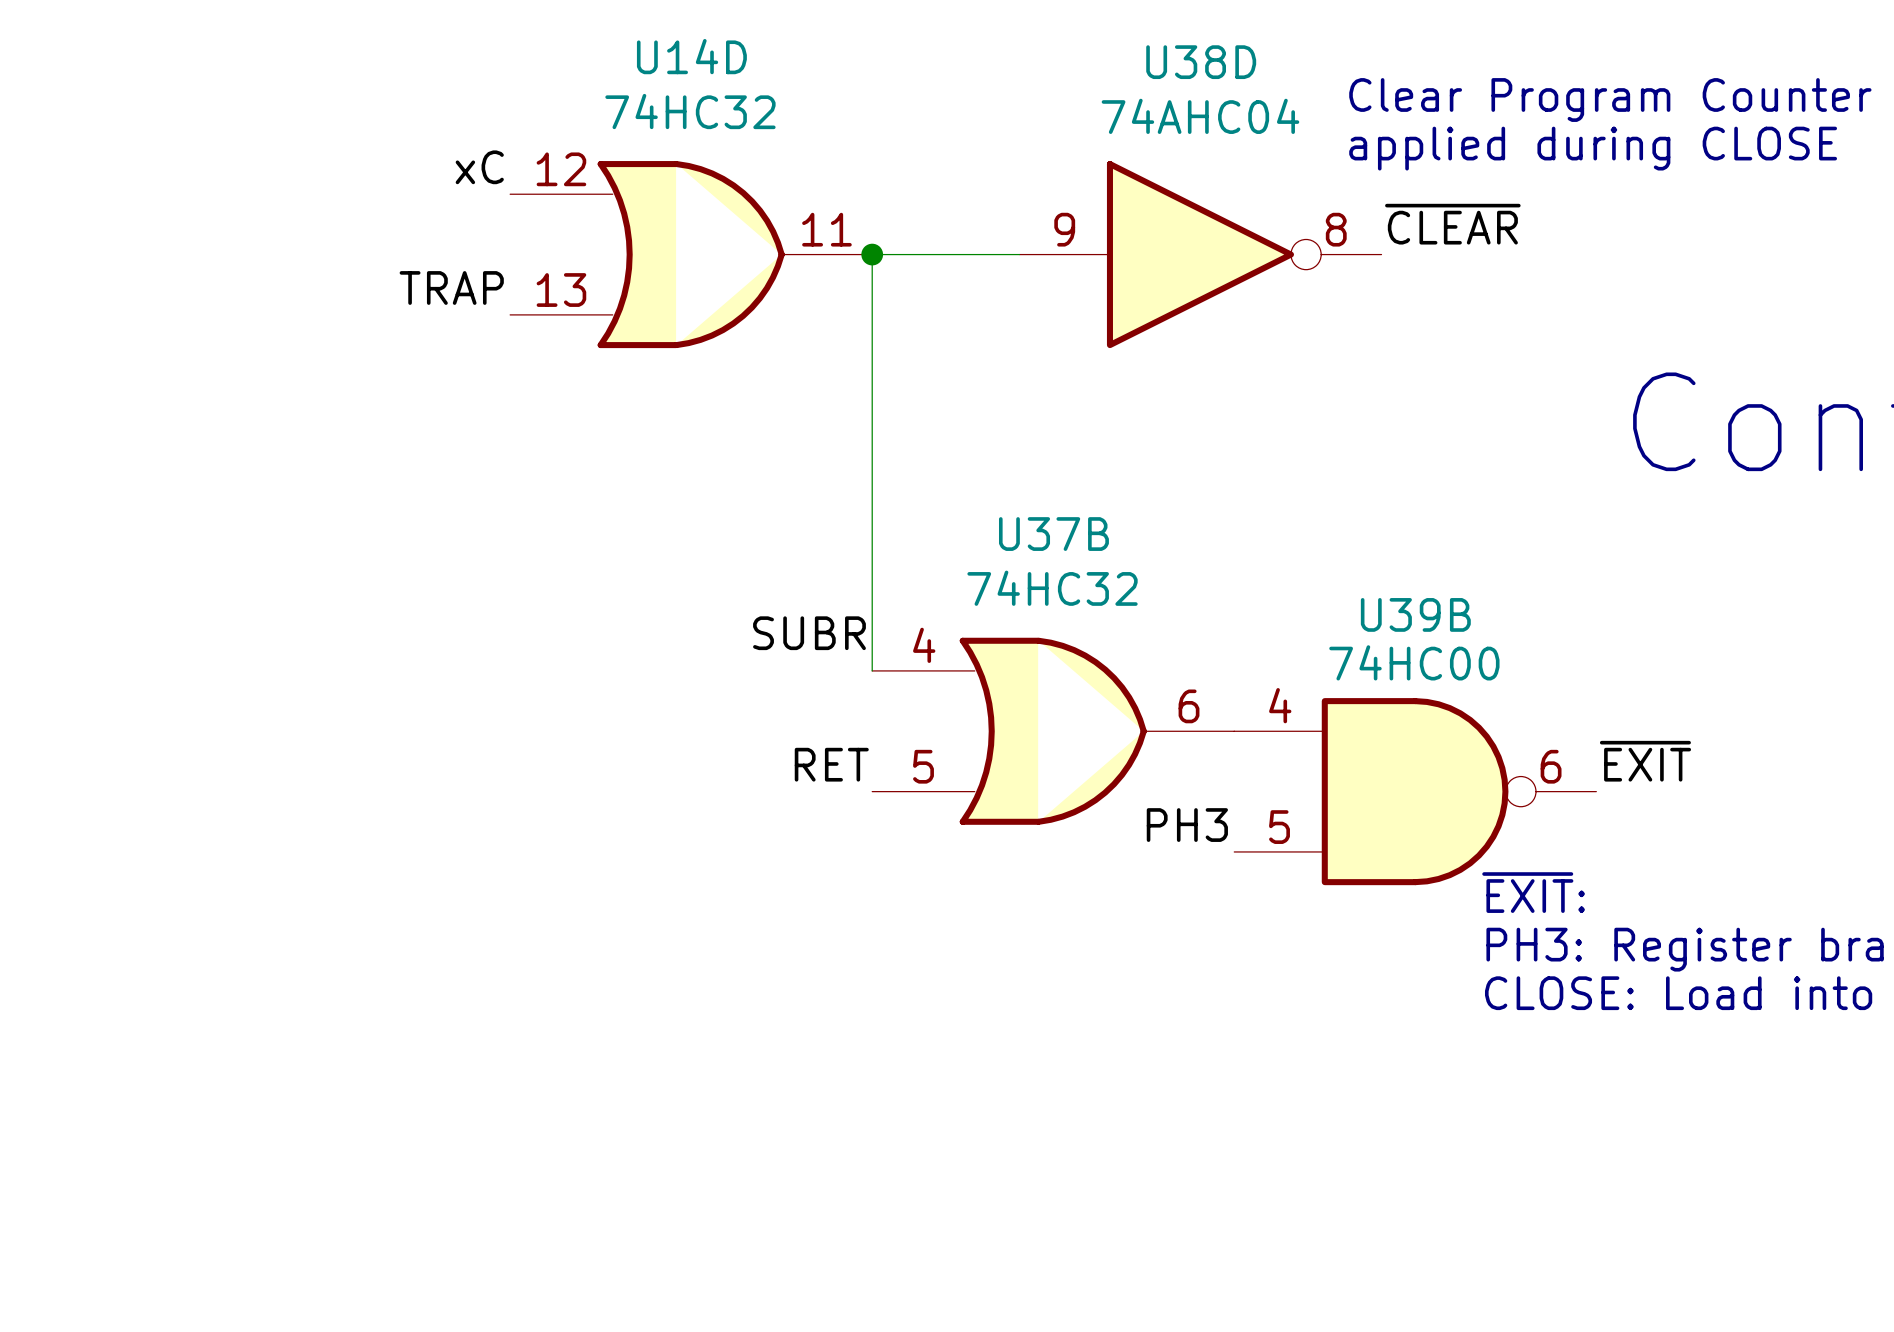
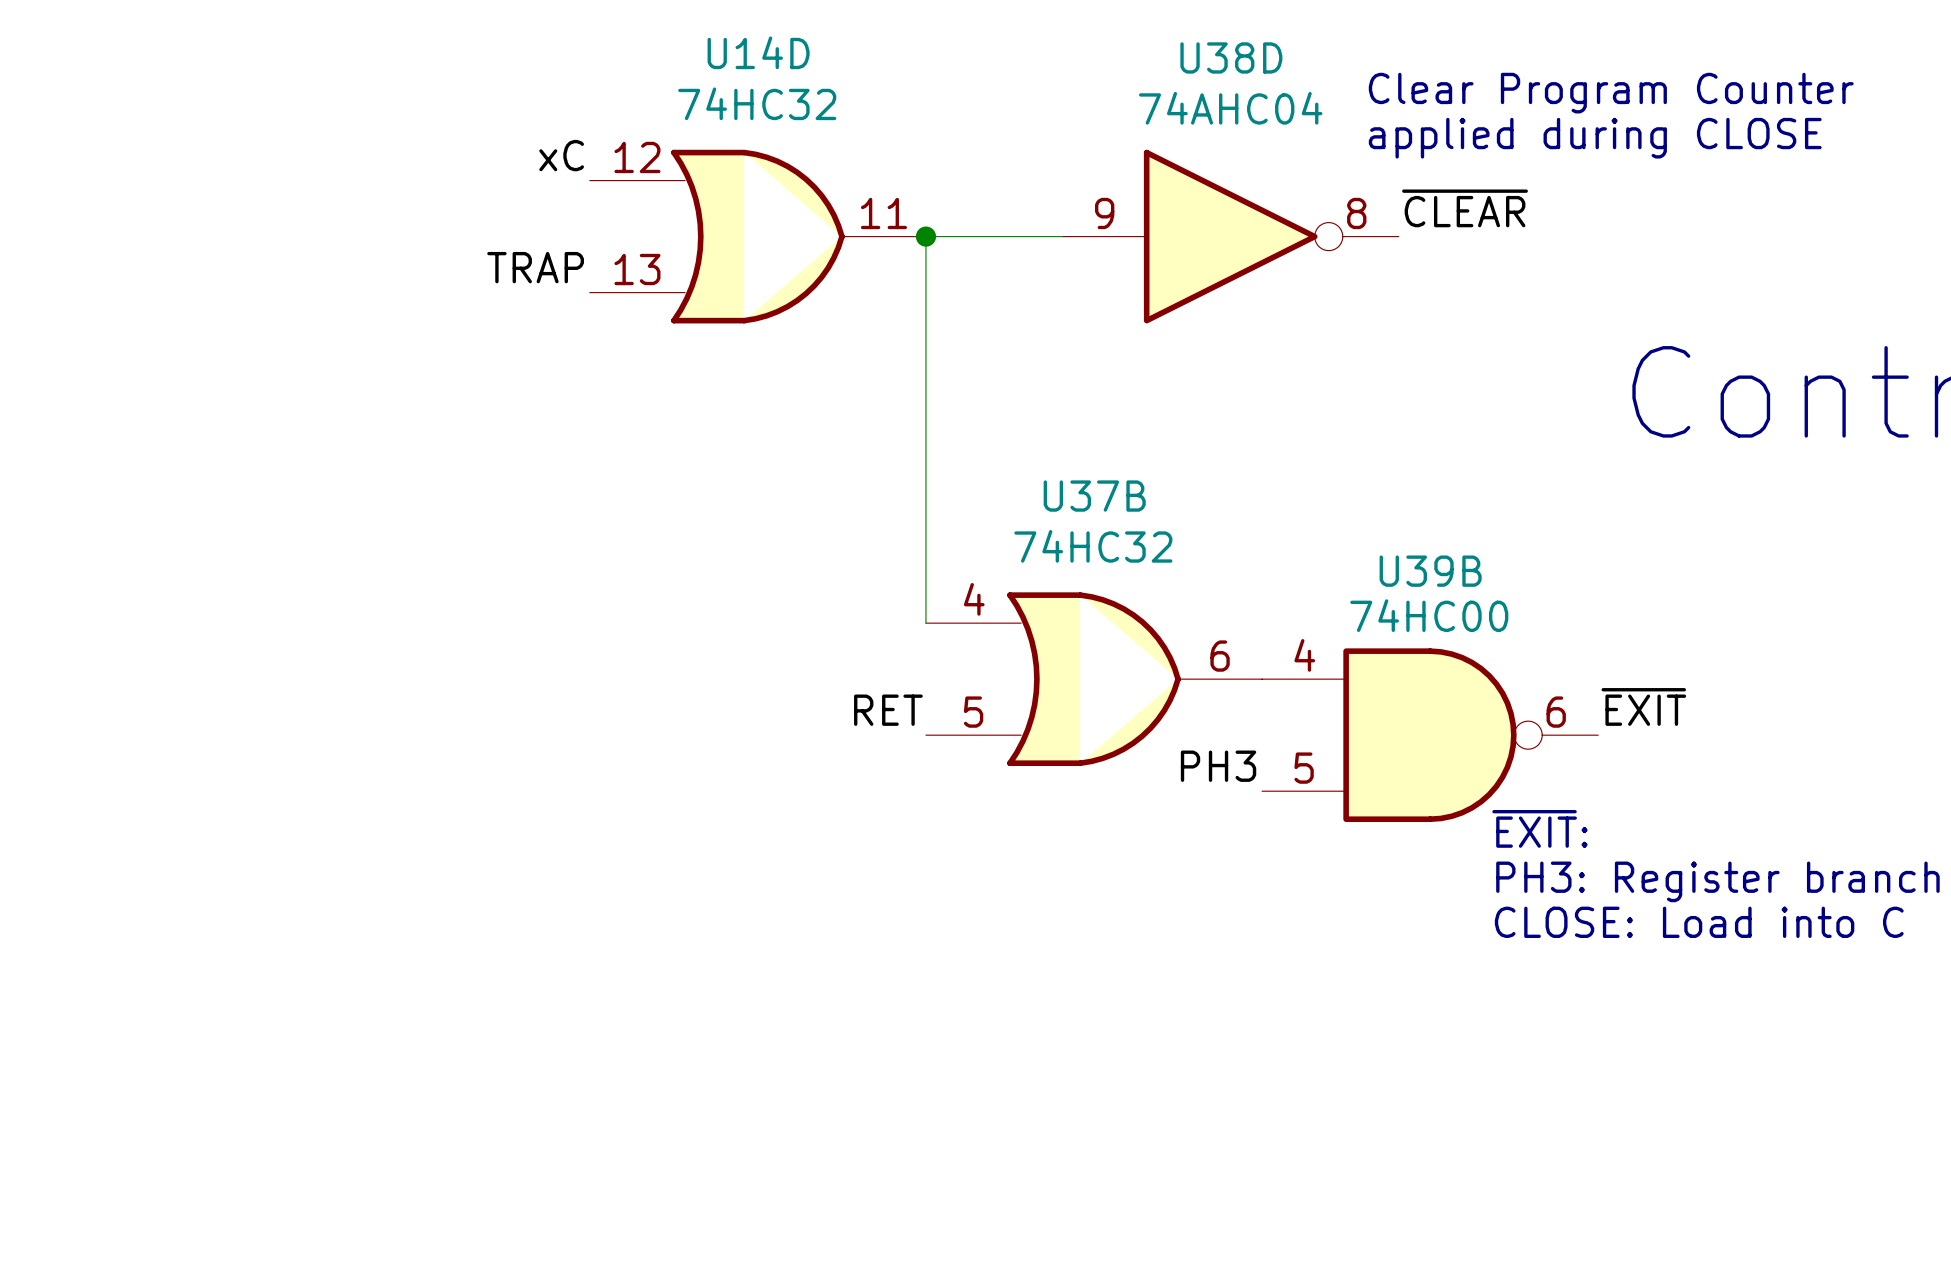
label: SUBR (809, 633) -> none

